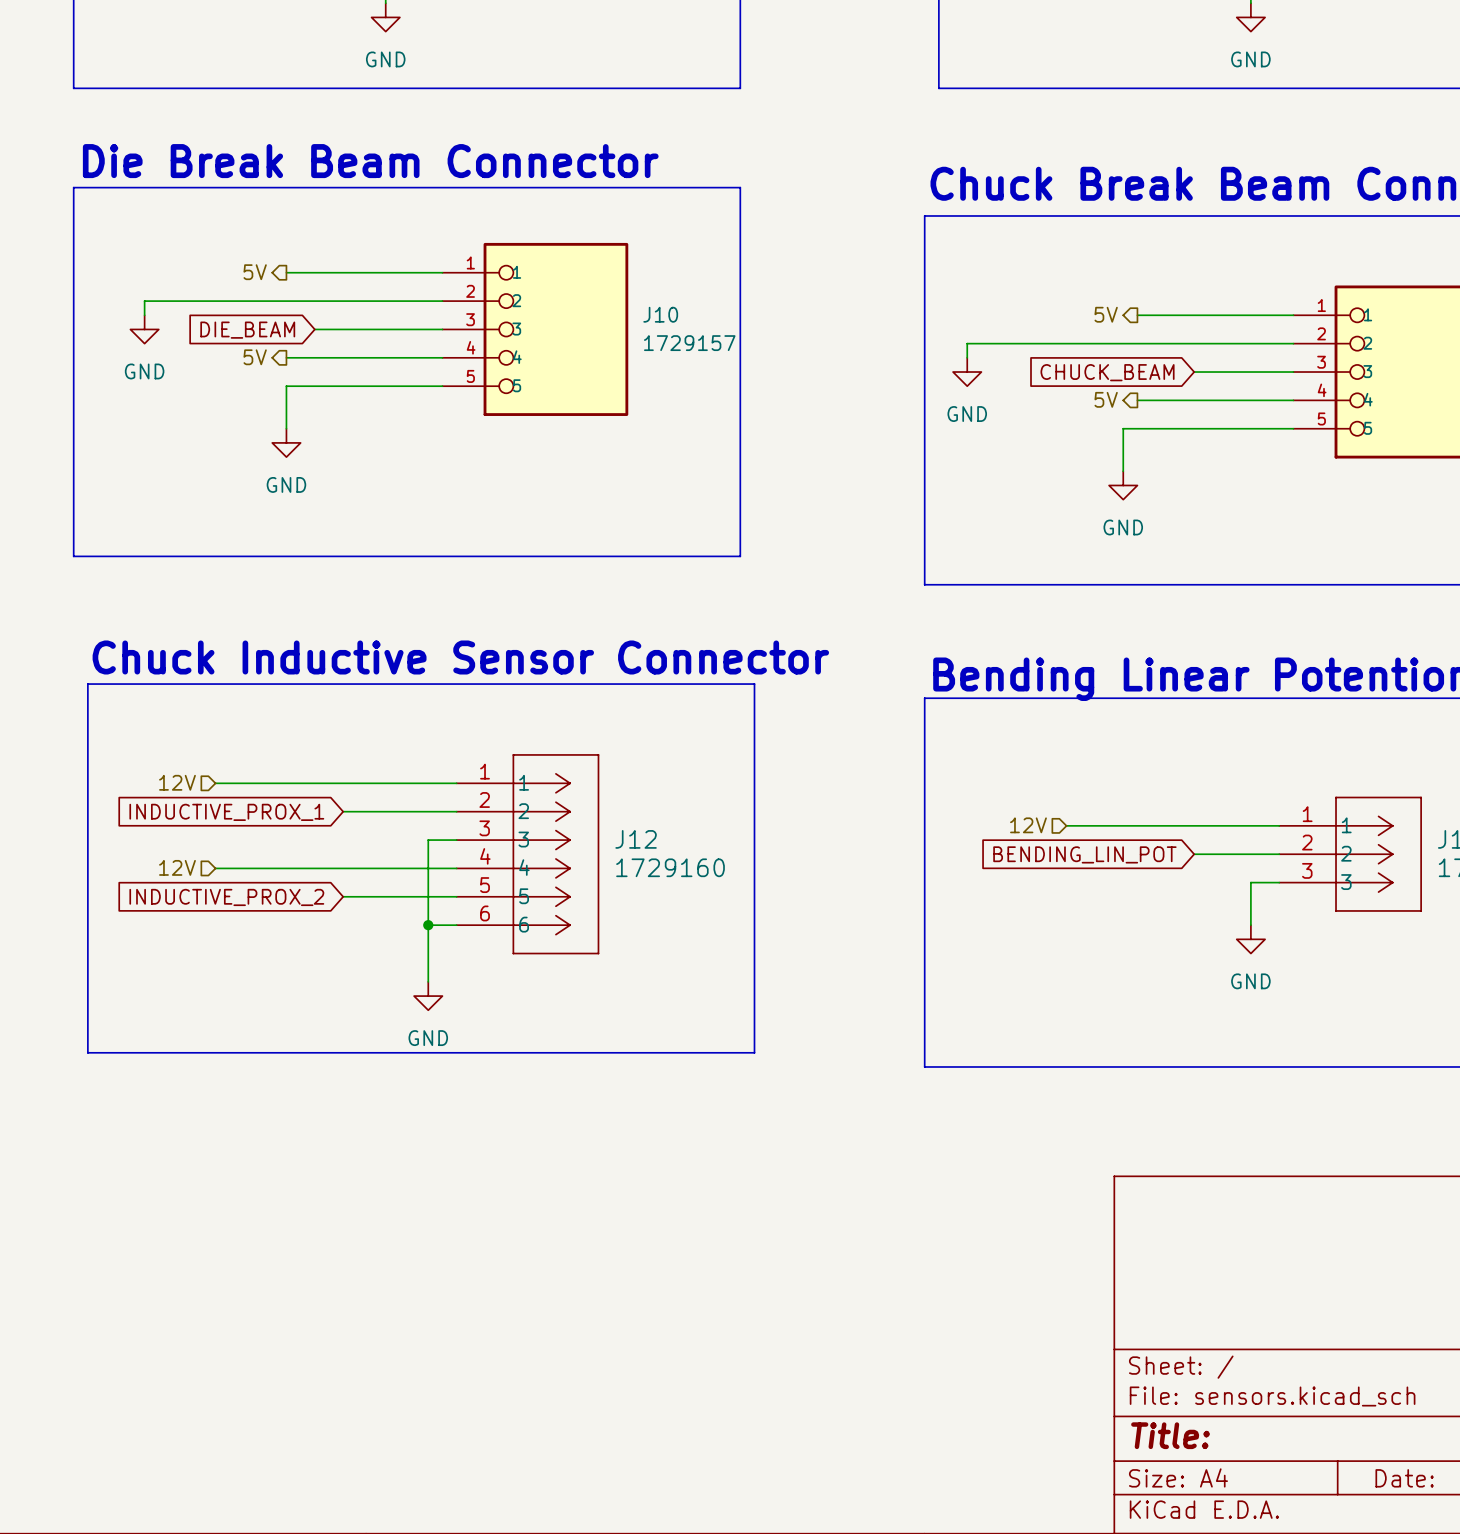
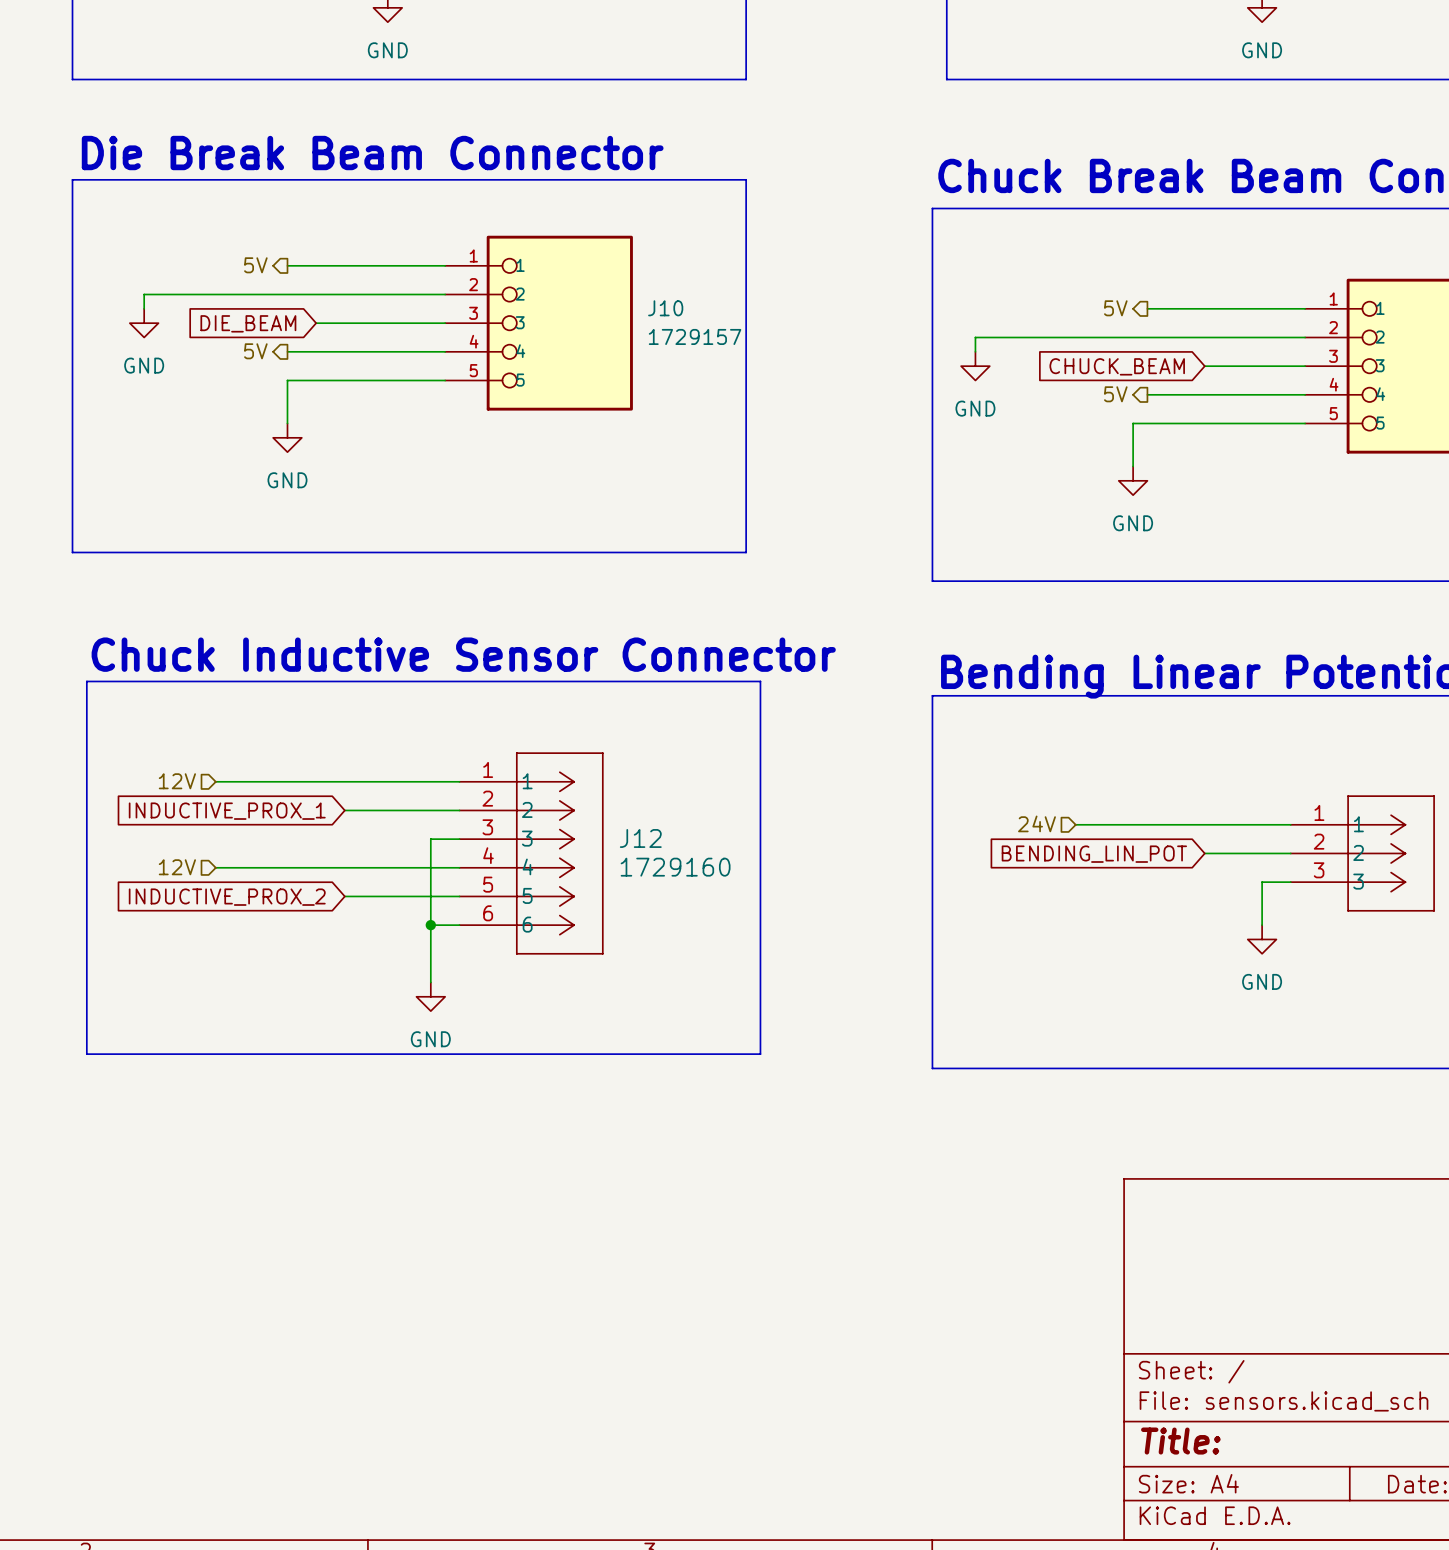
hierarchical label: 12V (1028, 825) -> 24V (1036, 823)

